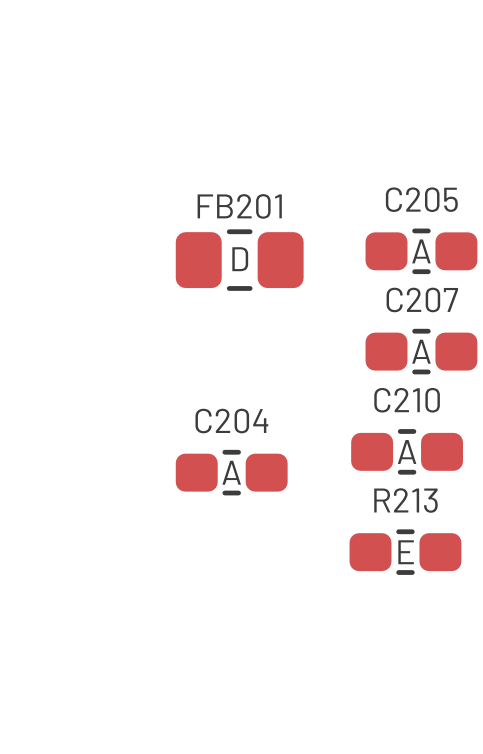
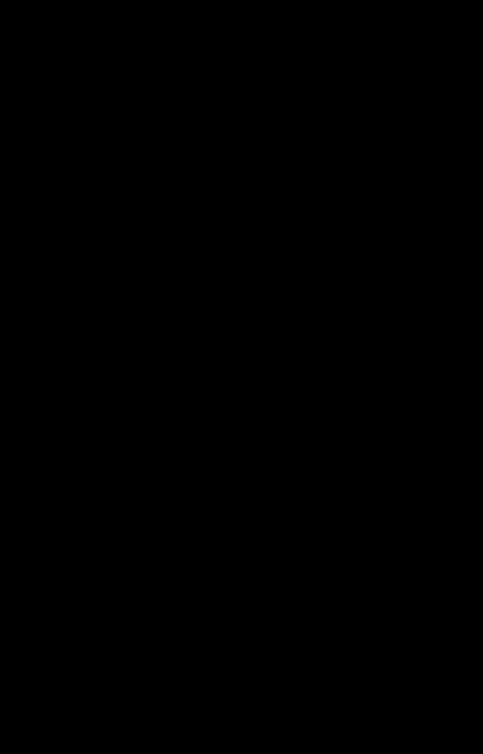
C205: (421, 251) -> none
FB201: (239, 260) -> none
C207: (421, 351) -> none
C210: (407, 451) -> none
C204: (231, 472) -> none
R213: (405, 552) -> none

